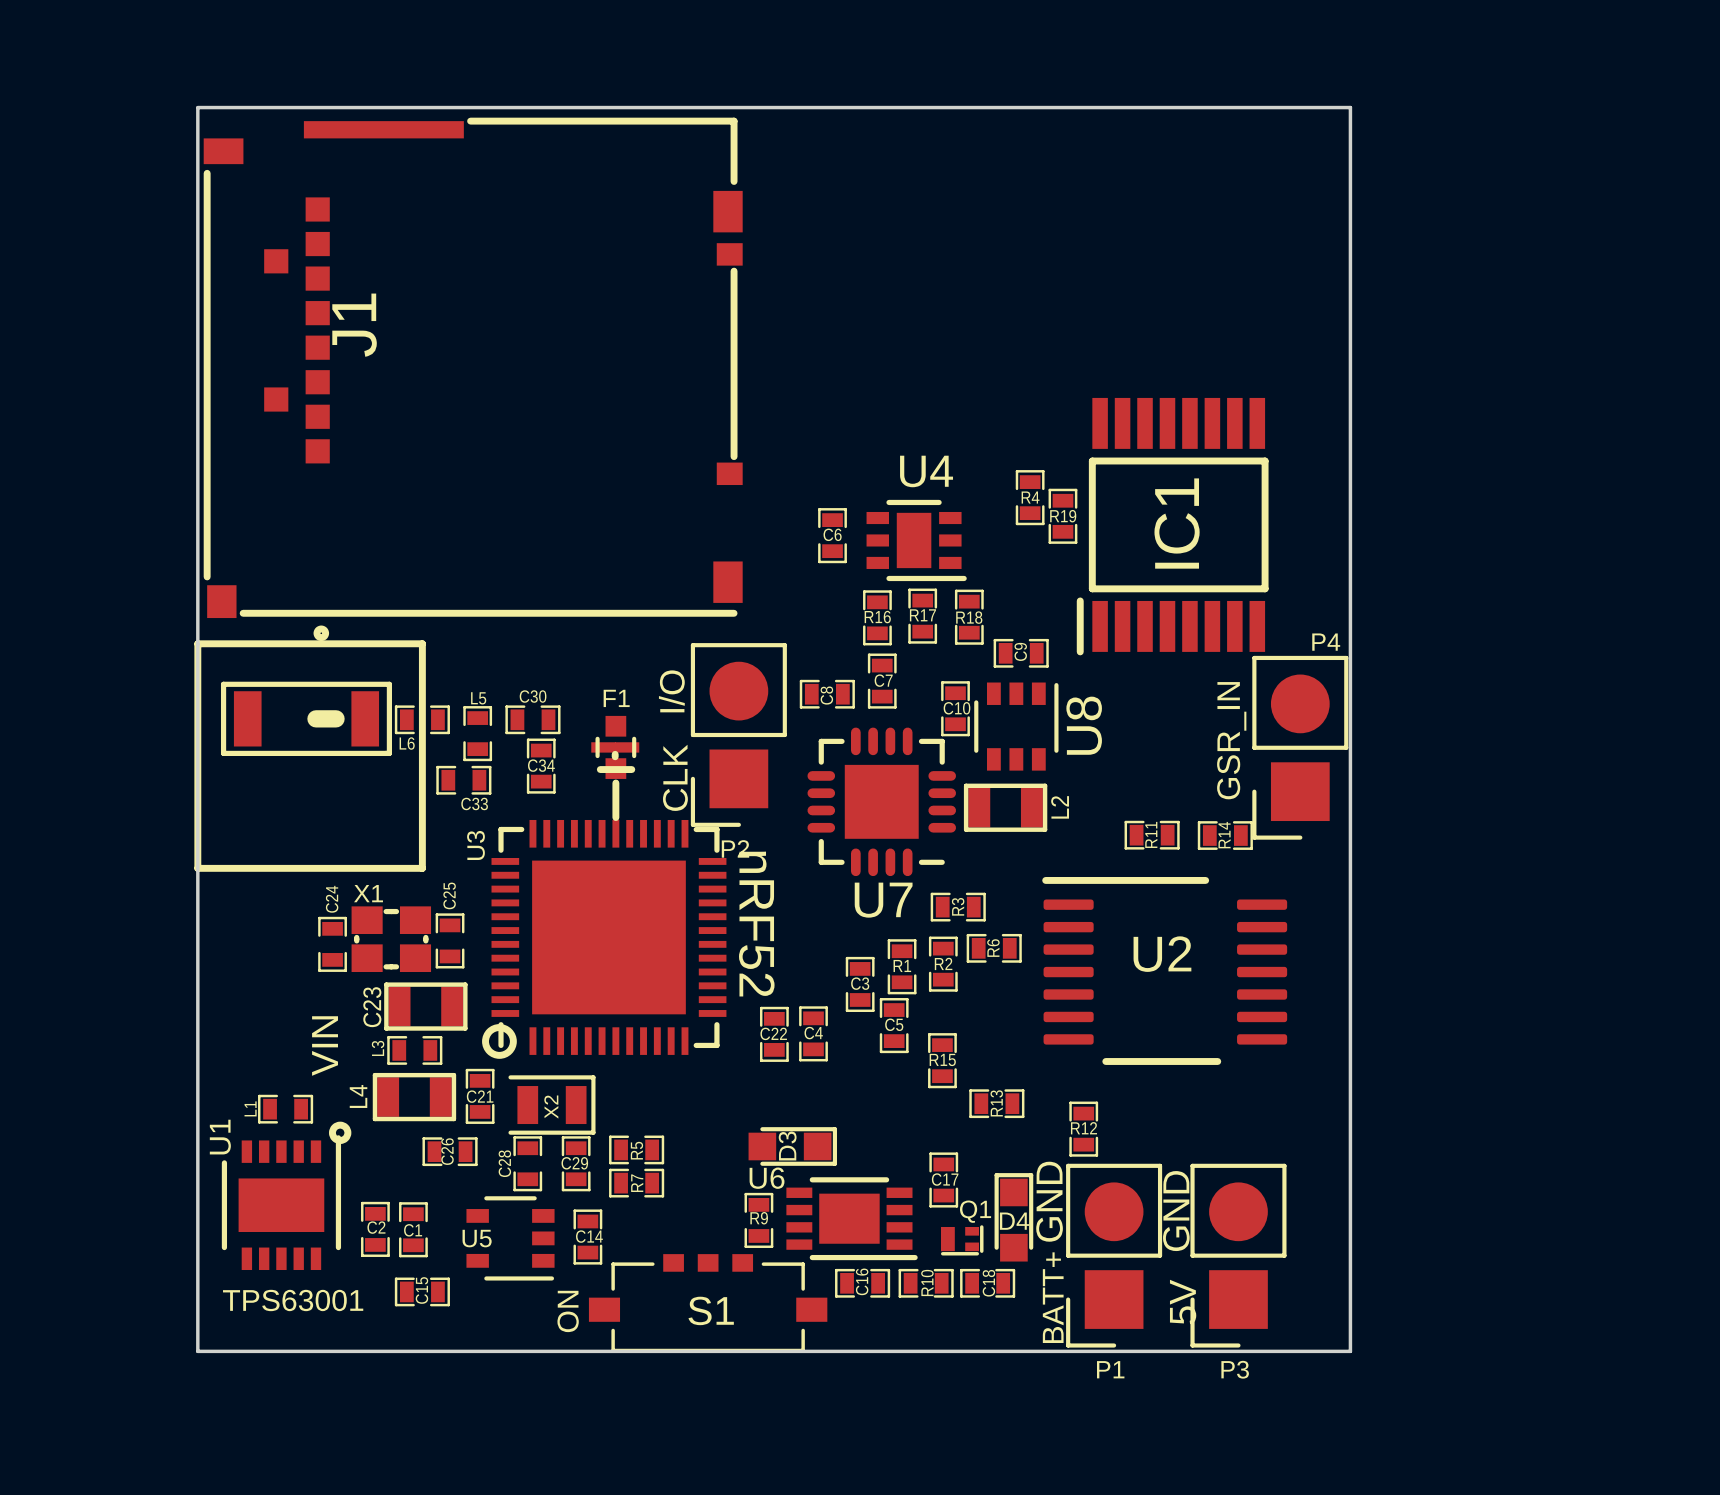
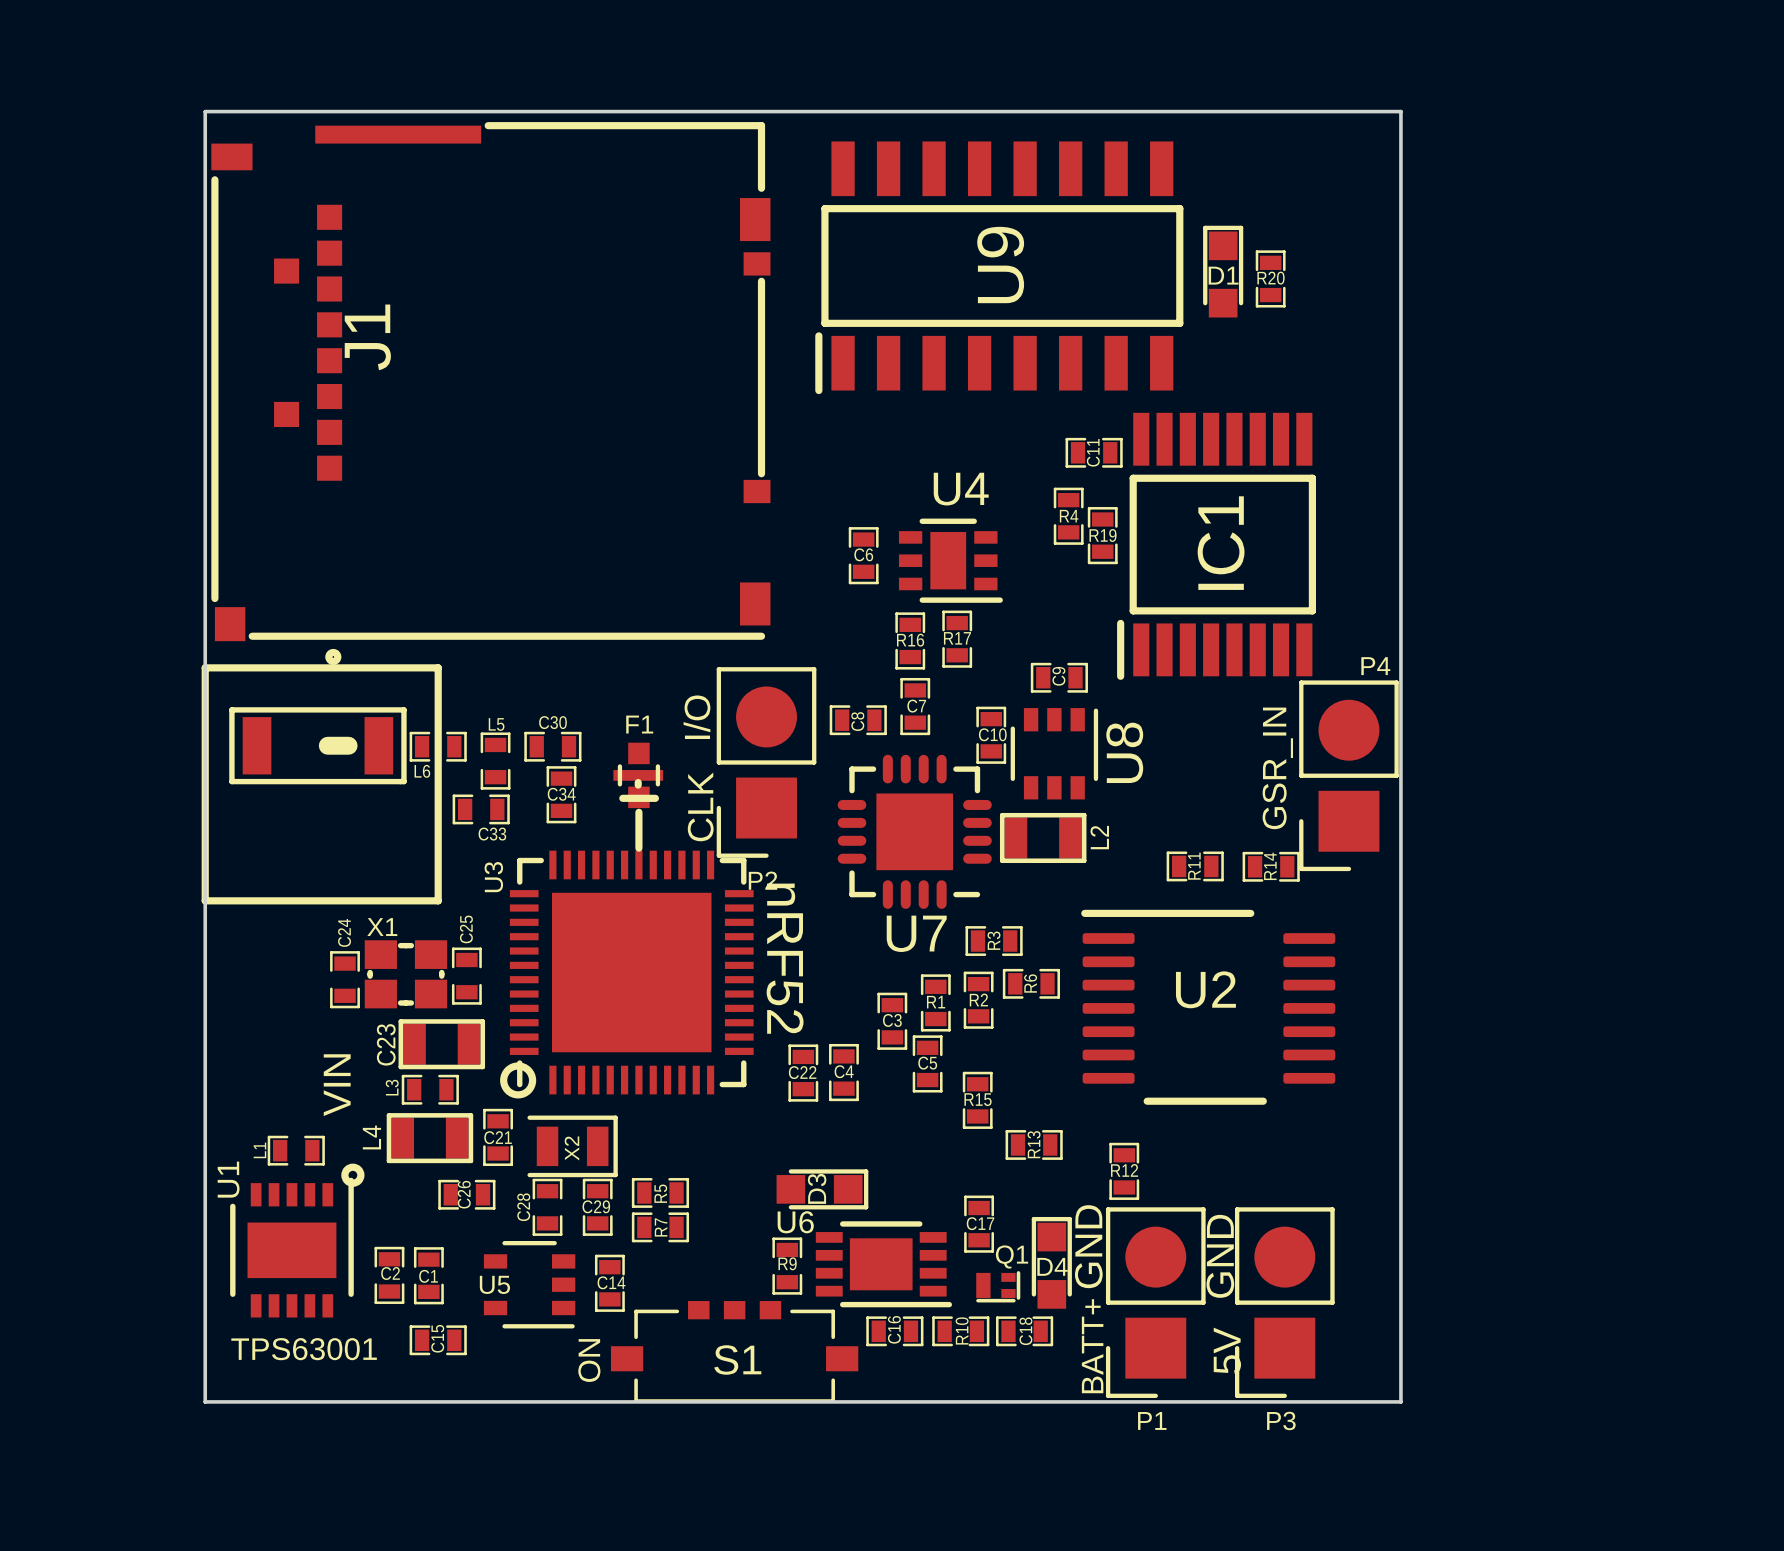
U9: none -> (999, 267)
D1: none -> (1223, 271)
R20: none -> (1270, 278)
C11: none -> (1094, 452)
R18: (969, 617) -> none

